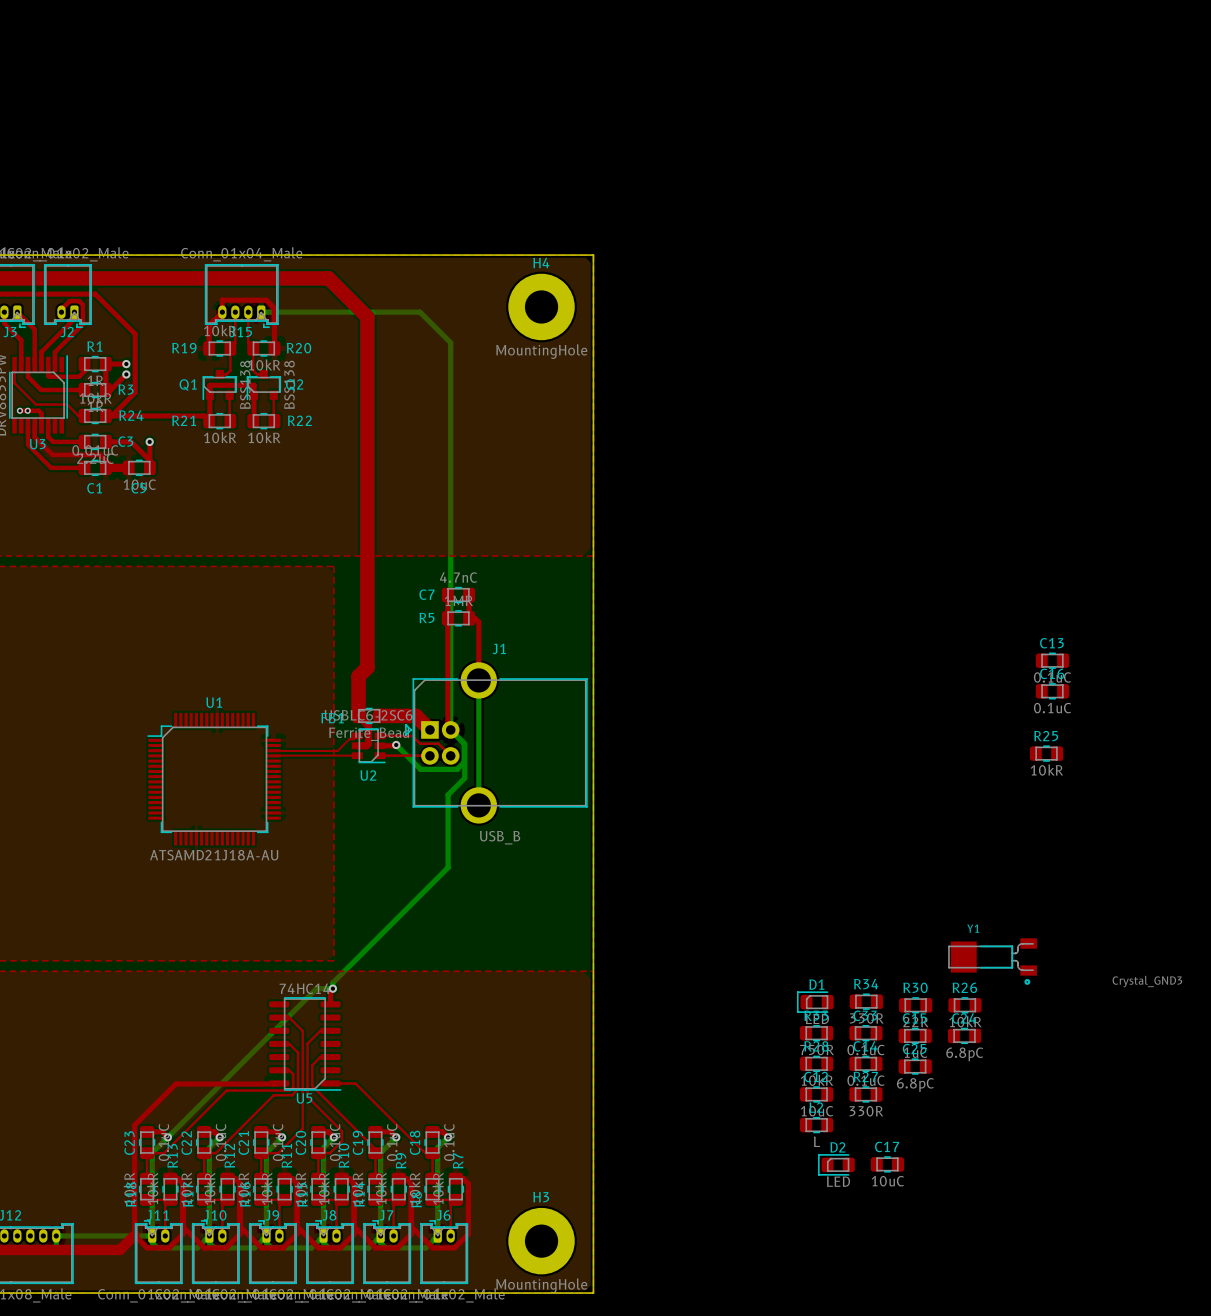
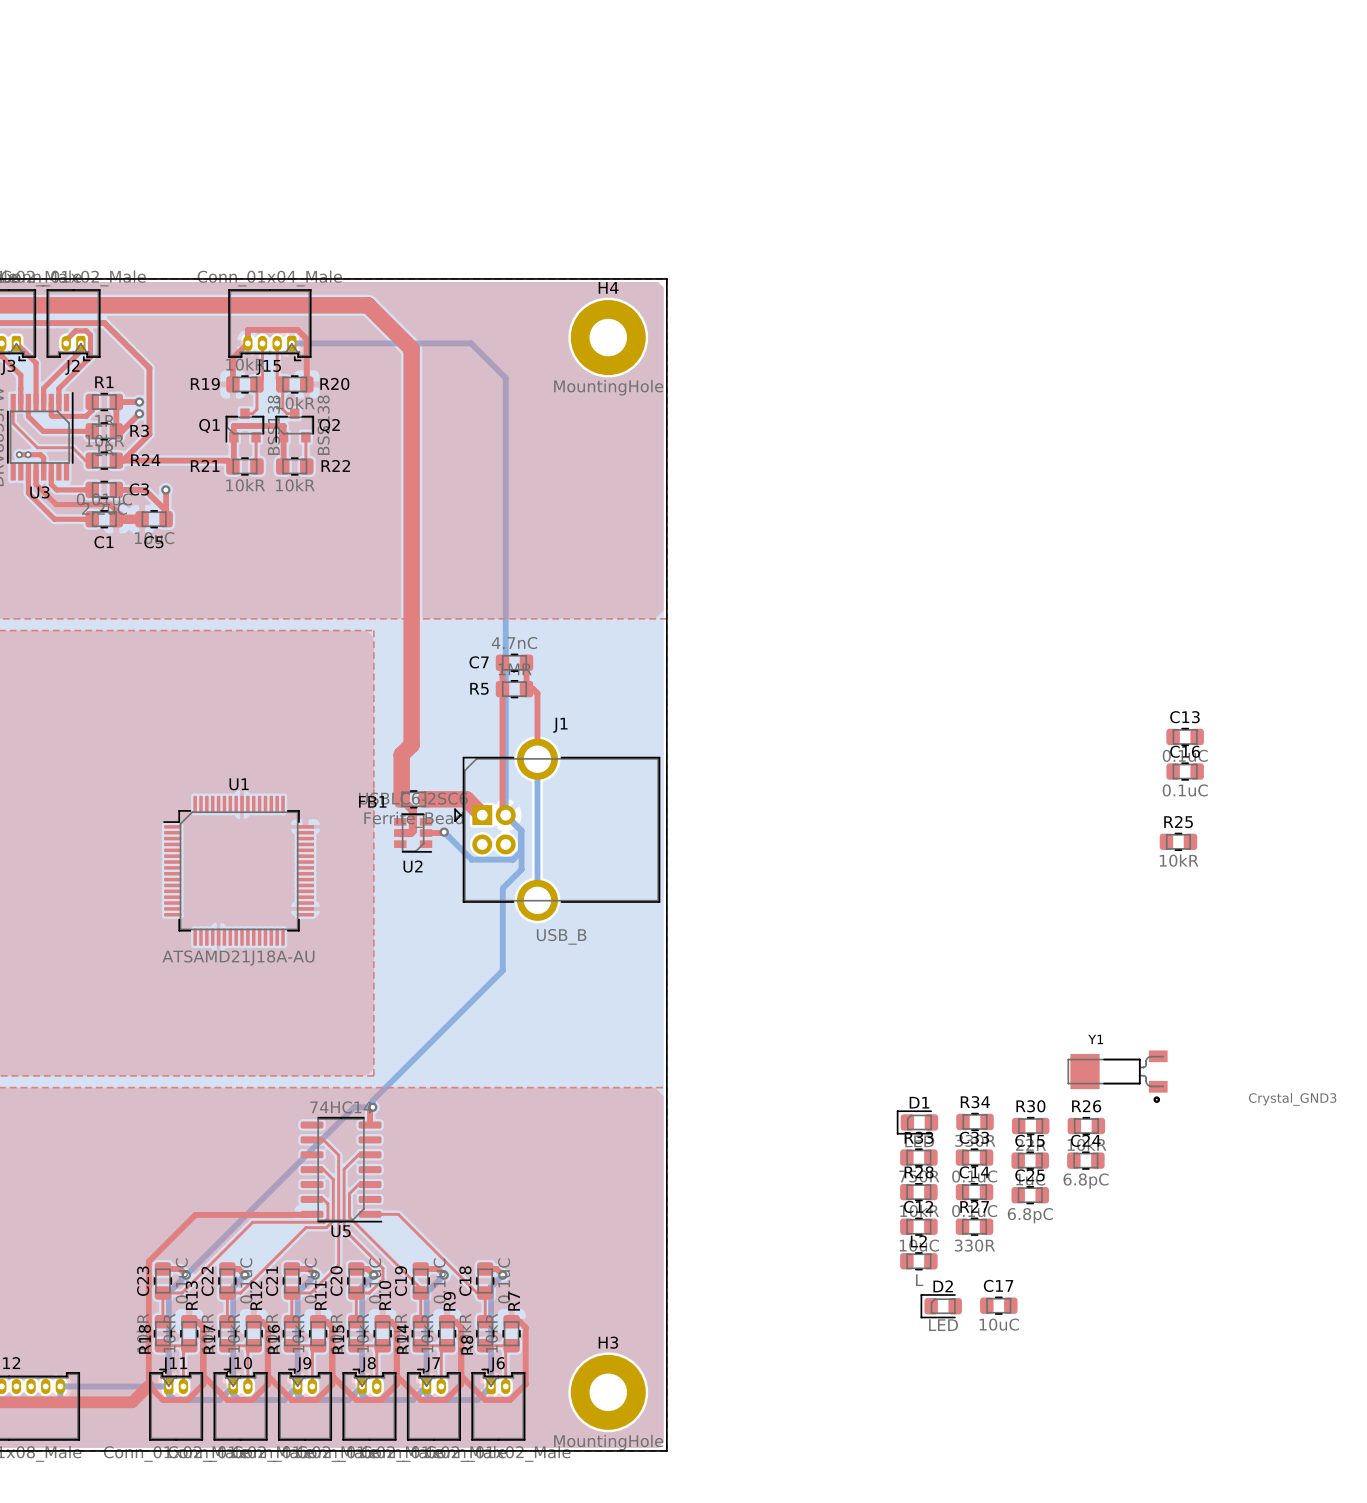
top track: (357, 735) (353, 739) (349, 739) (337, 750) (273, 750) -> none
top track: (380, 735) (412, 735) (419, 743) (438, 743) (450, 755) -> none
top track: (357, 755) (273, 755) -> none
top track: (380, 755) (429, 755) -> none

